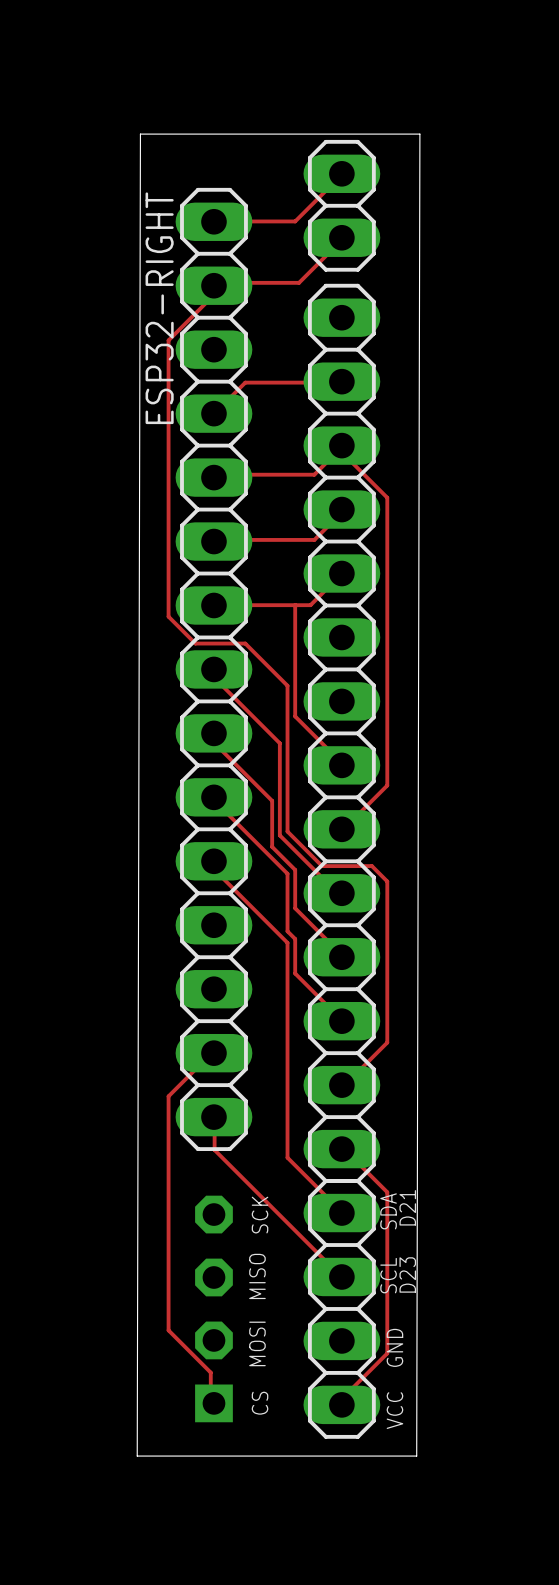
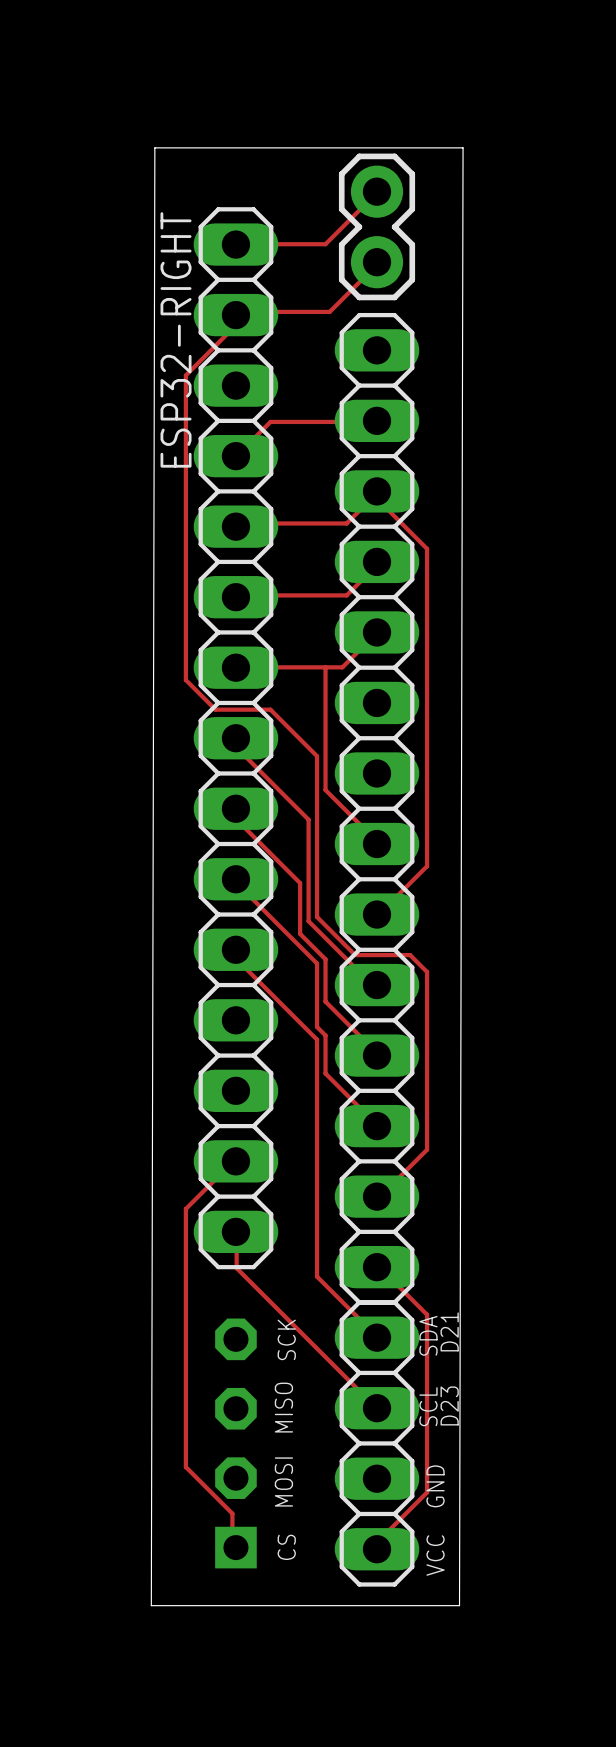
part footprint: [303, 139, 381, 272] -> [338, 153, 416, 301]

